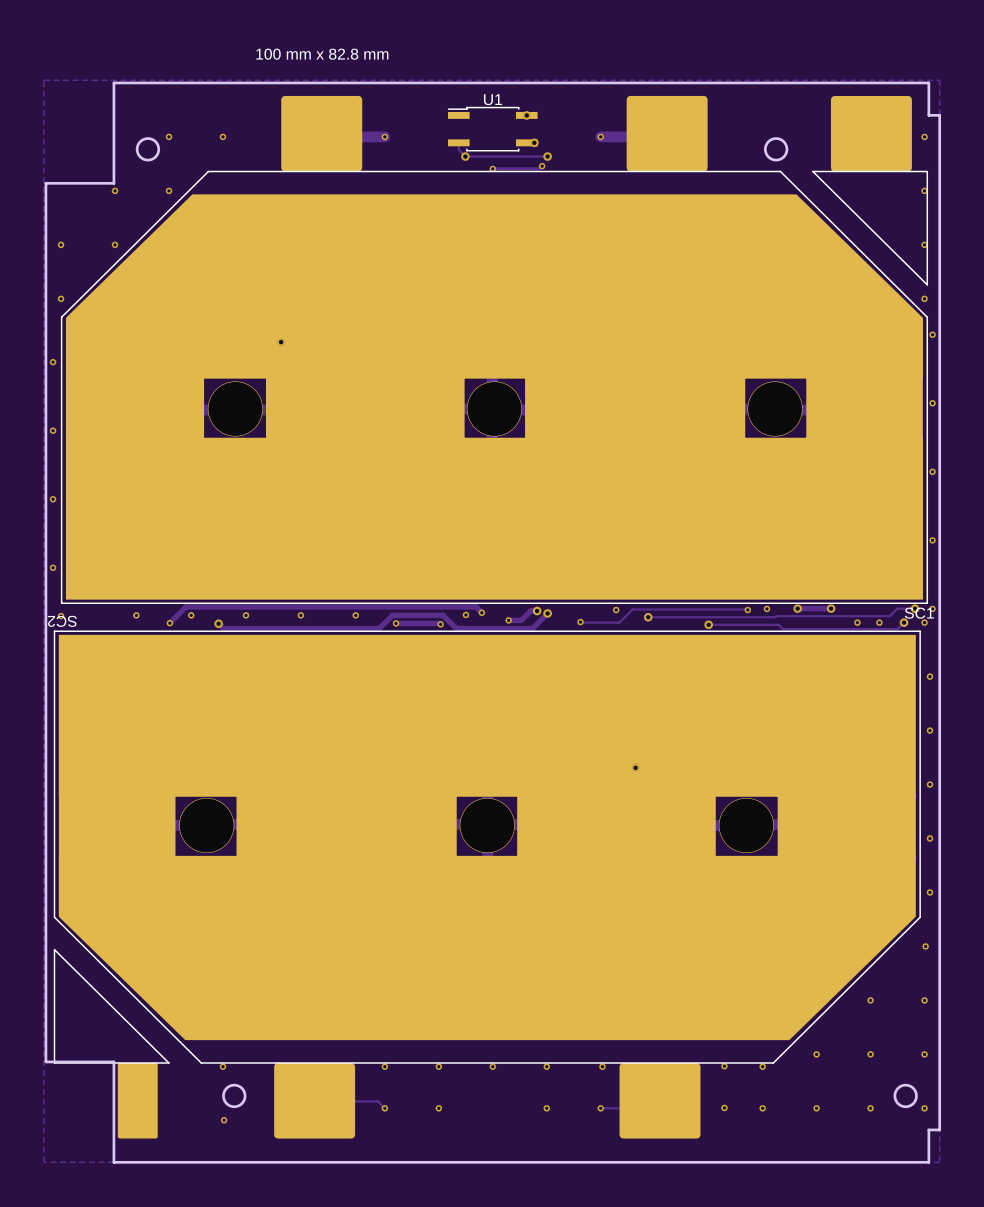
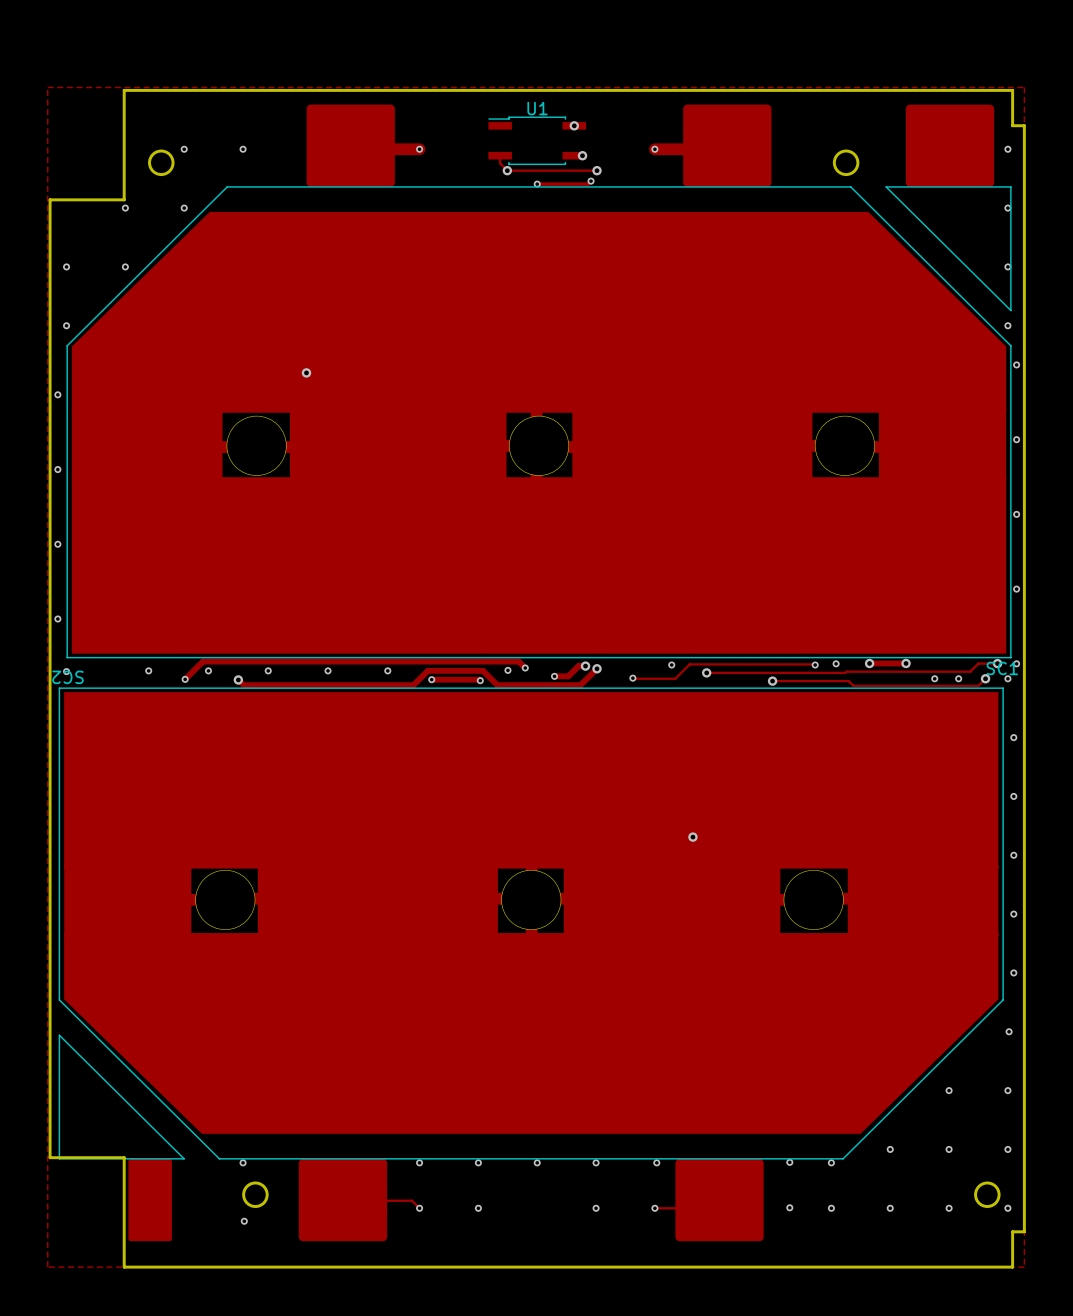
text: 100 mm x 82.8 mm (322, 54) -> none

